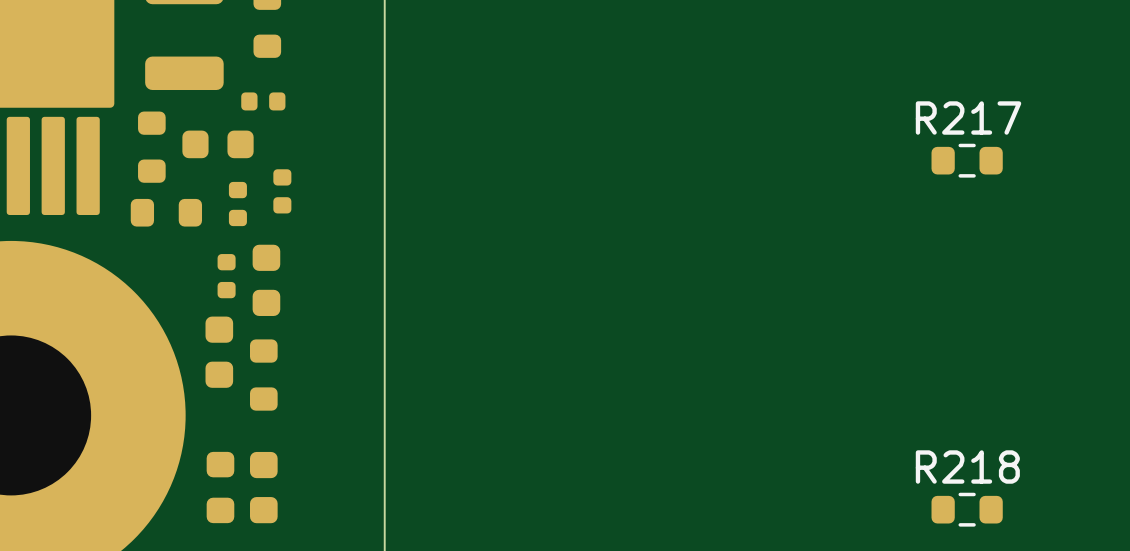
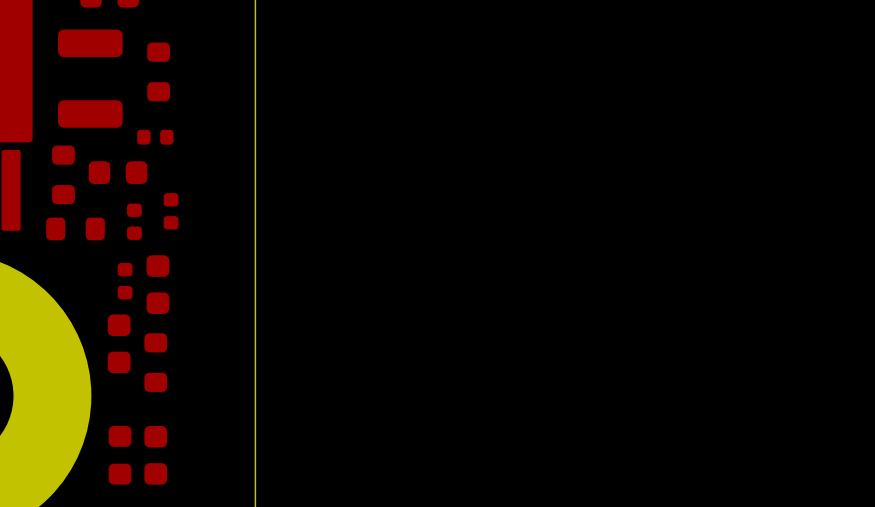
R217: (967, 160) -> none
R218: (967, 509) -> none

